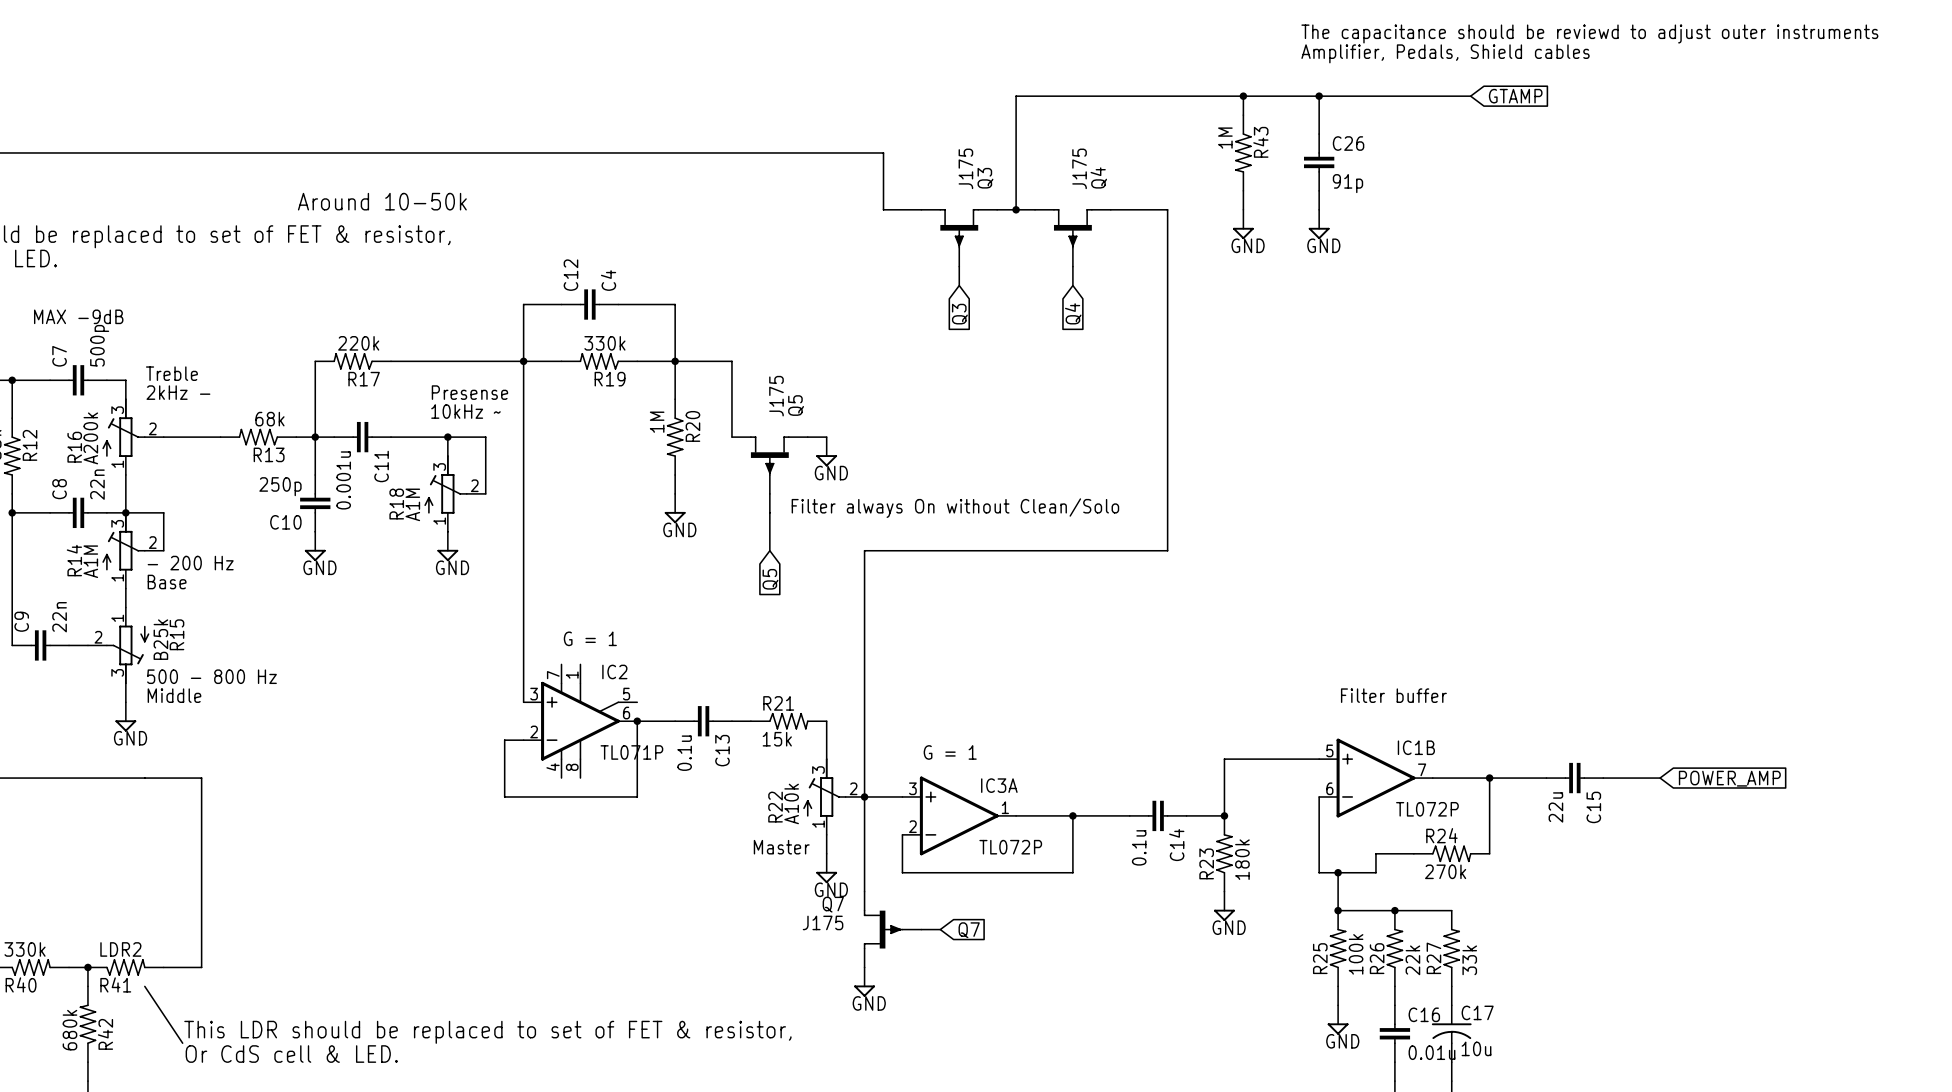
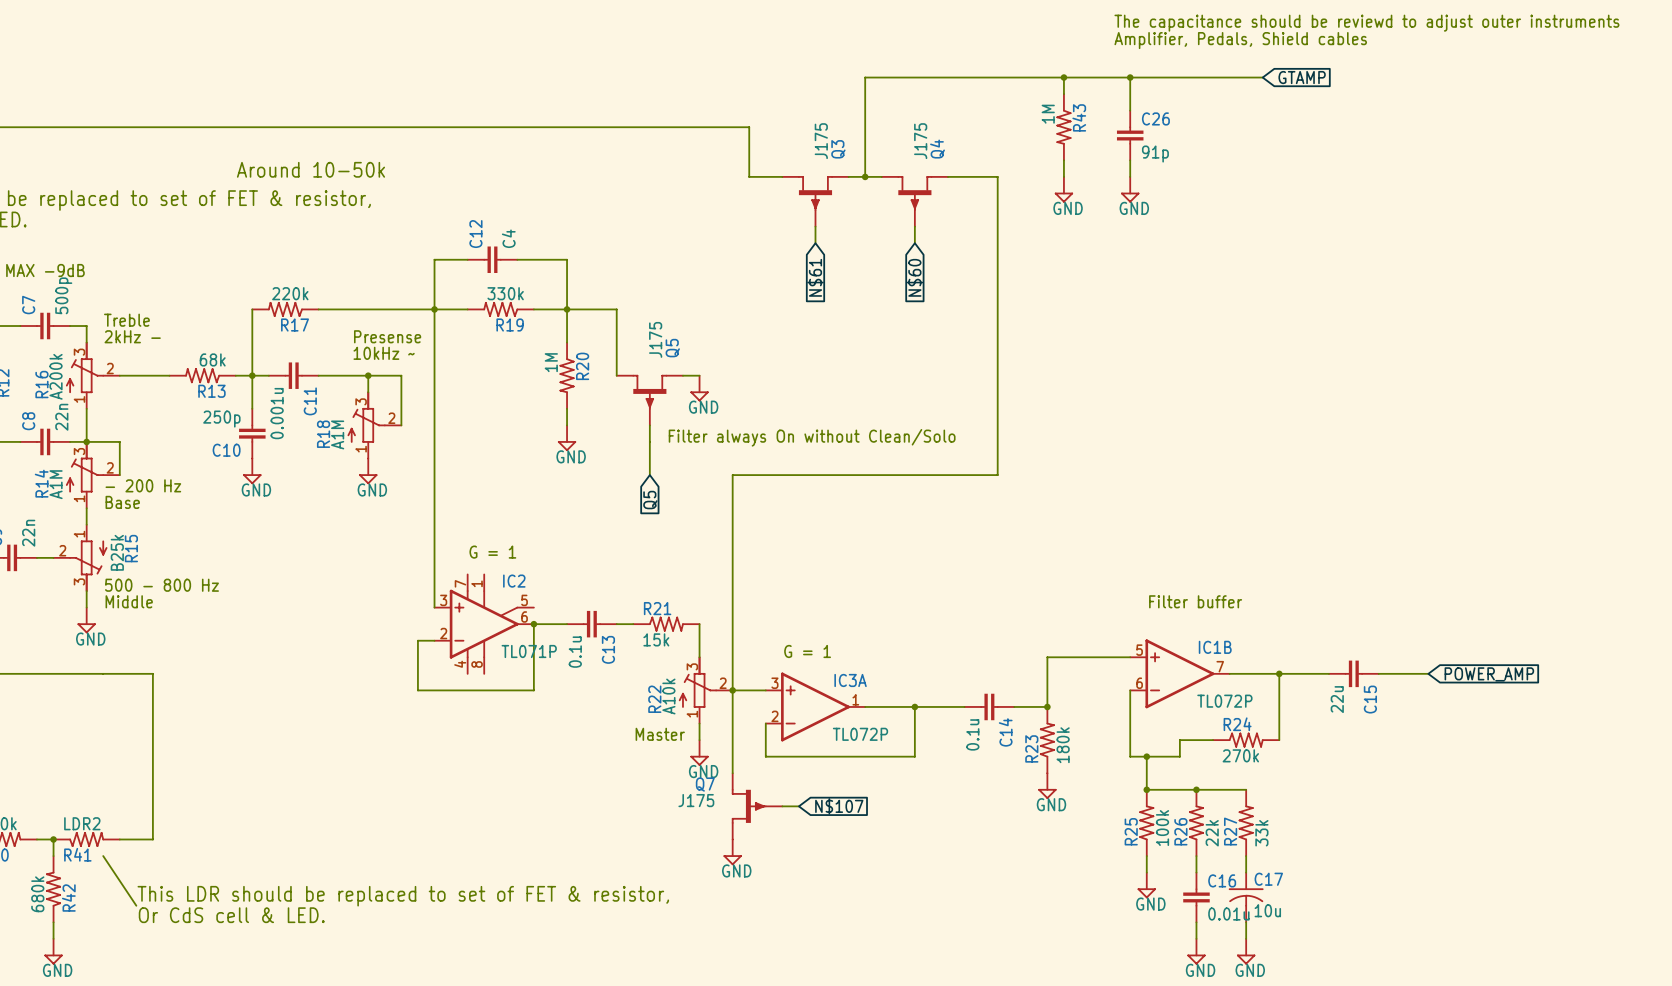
global label: Q4 (1073, 313) -> N$60 (914, 277)
global label: Q3 (959, 314) -> N$61 (815, 277)
global label: Q7 (969, 930) -> N$107 (839, 806)

